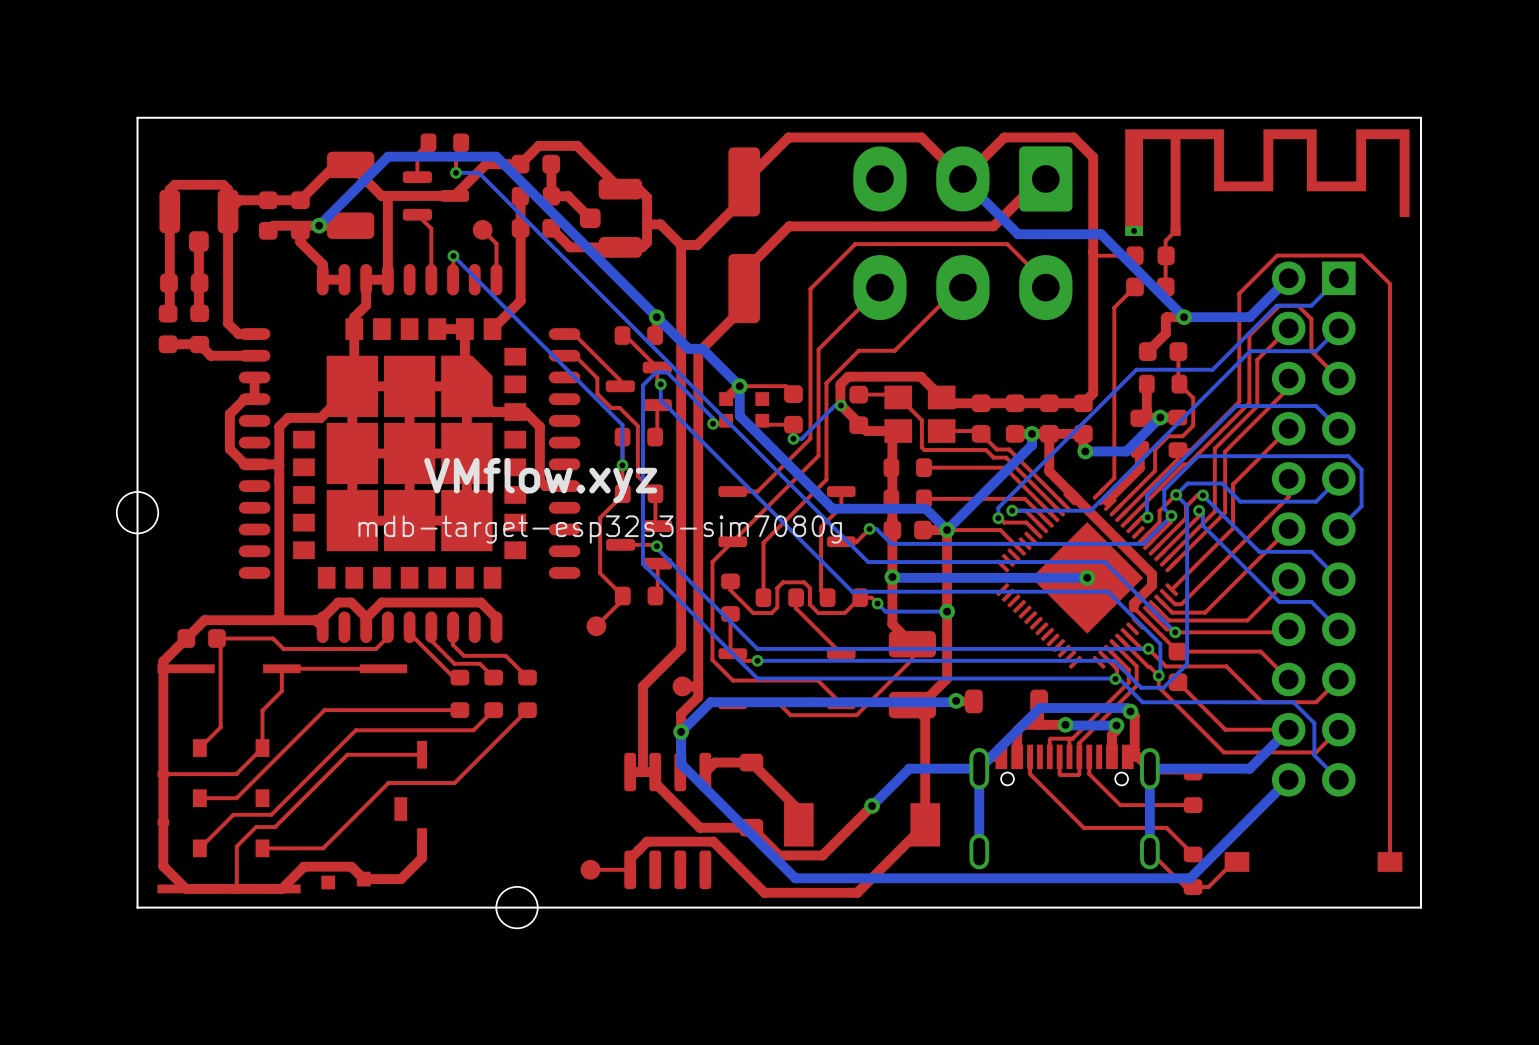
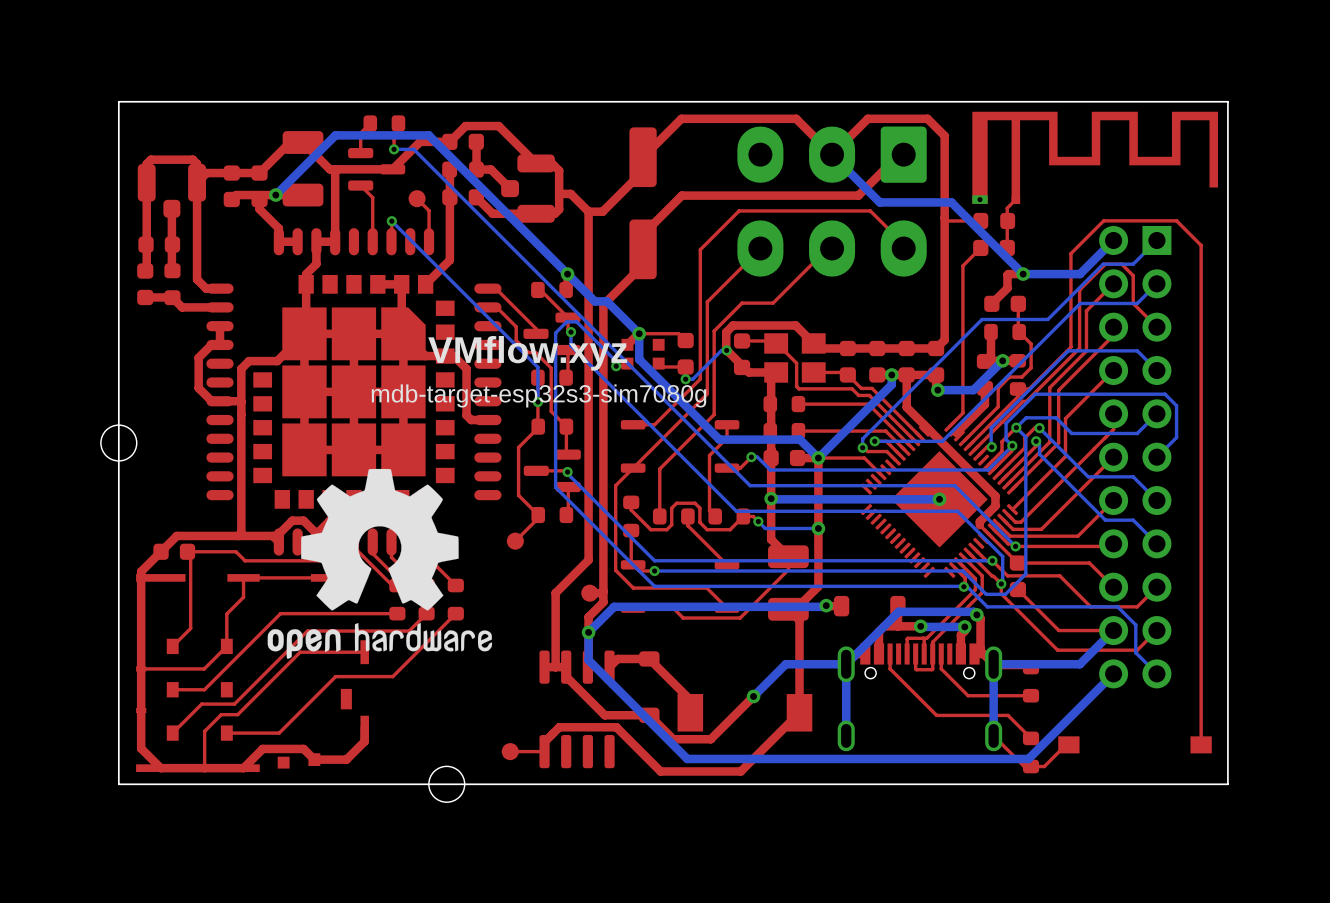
text position: VMflow.xyz (540, 480) -> VMflow.xyz (527, 353)
text position: mdb-target-esp32s3-sim7080g (600, 529) -> mdb-target-esp32s3-sim7080g (539, 395)
drawing: none -> [267, 468, 493, 659]

